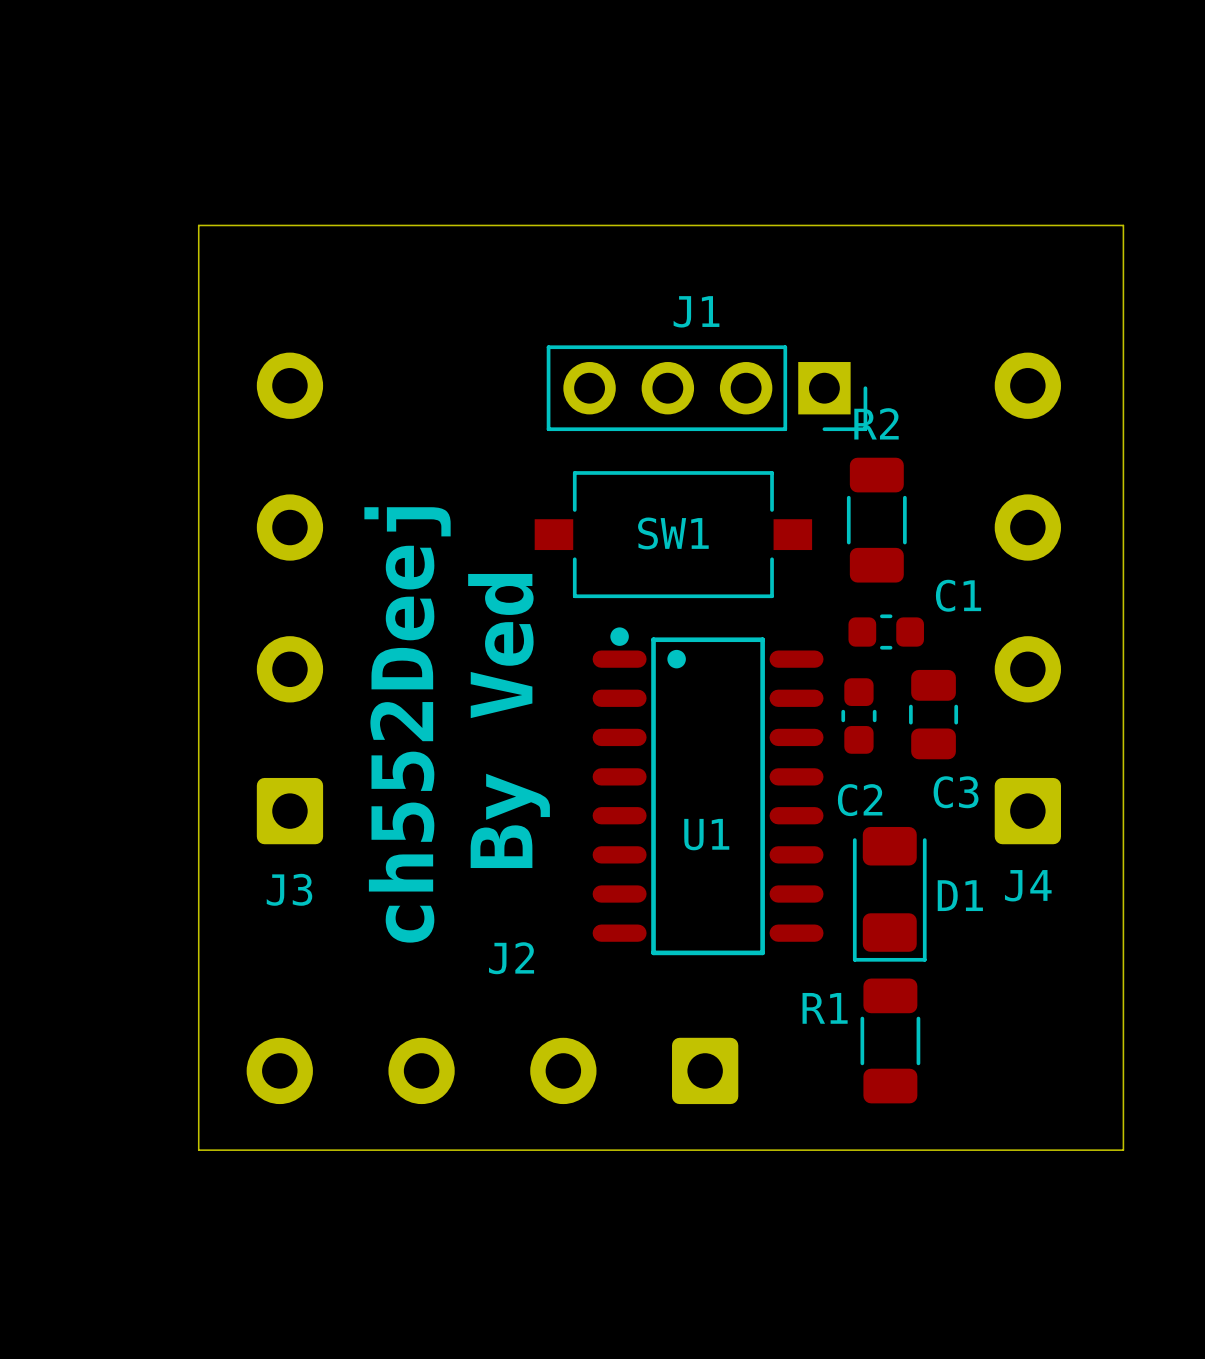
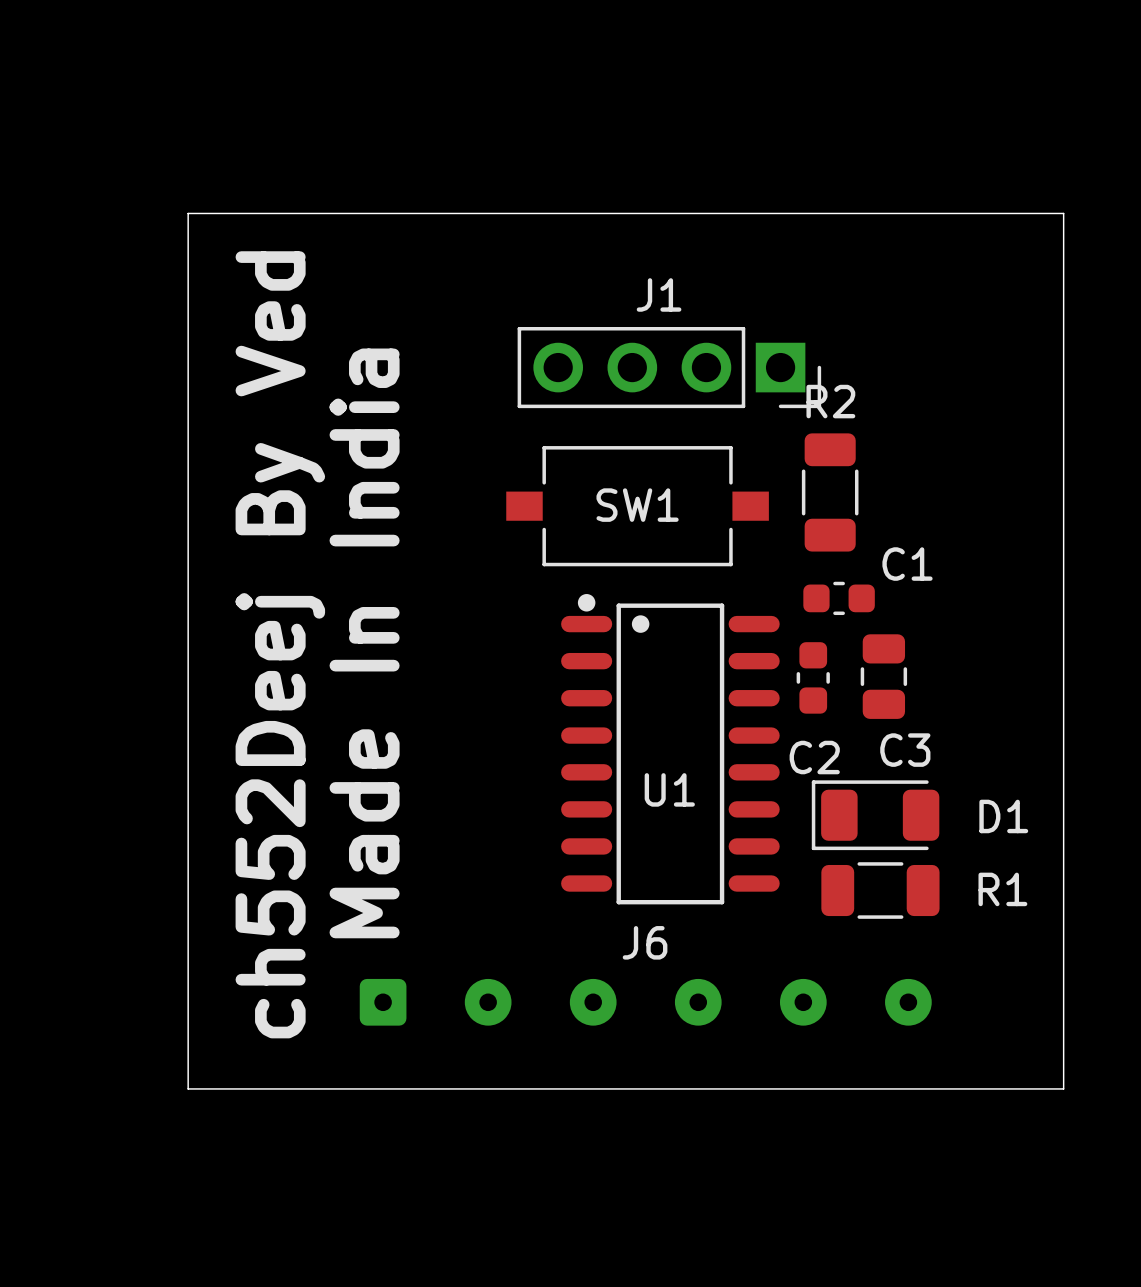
J3: (289, 598) -> none
J4: (1027, 598) -> none
text: none -> Made In India (364, 643)
text: By Ved (509, 720) -> none
text: ch552Deej (407, 724) -> ch552Deej By Ved (280, 644)
D1 rotation: 0° (889, 894) -> 90° clockwise (875, 815)
D1 name position: D1 (960, 895) -> D1 (1003, 816)
R1 name position: R1 (825, 1008) -> R1 (1002, 889)
R1 rotation: 0° (890, 1040) -> 90° clockwise (880, 890)
R1 position: (890, 1040) -> (880, 890)
J6: none -> (645, 1002)
J2: (492, 1070) -> none

